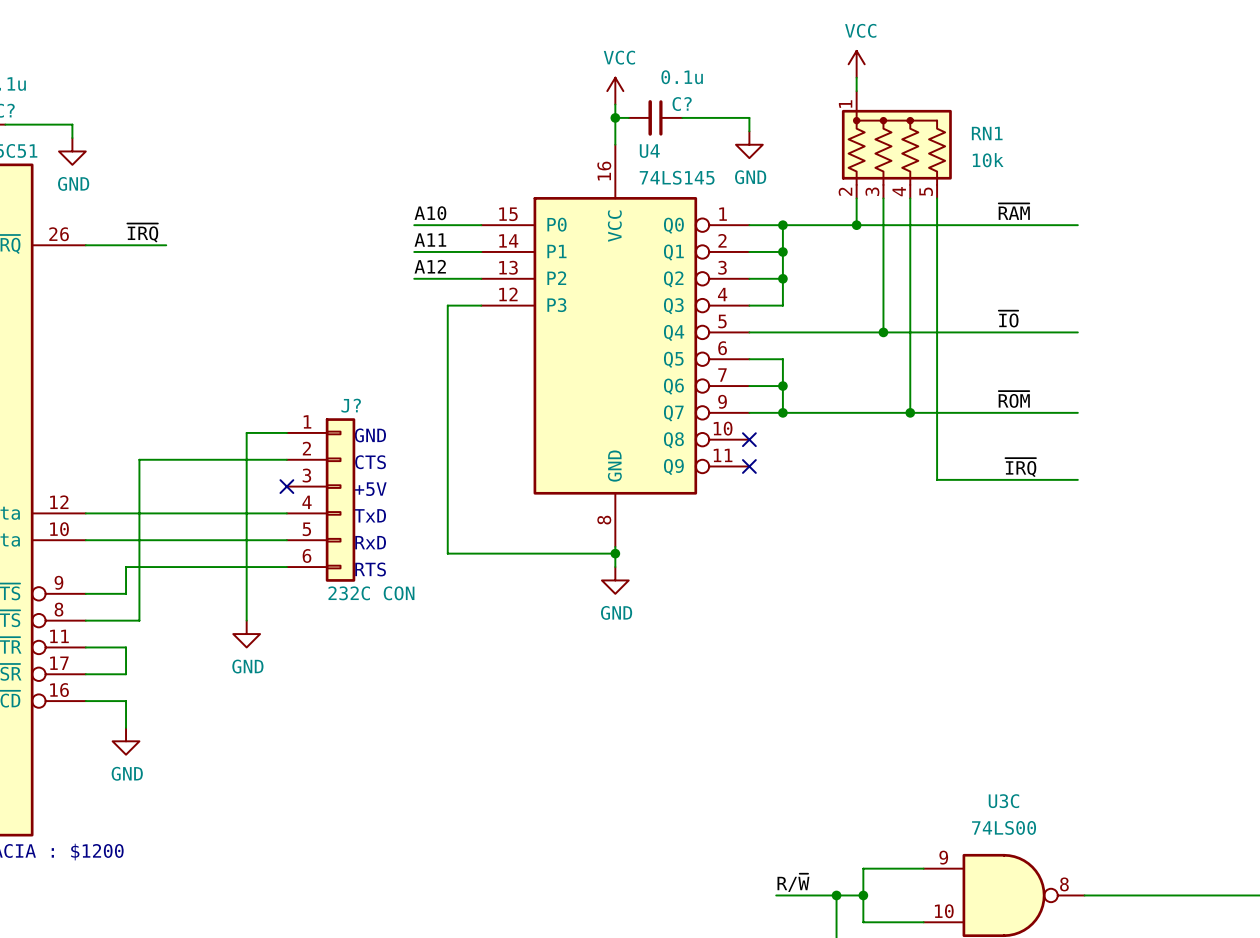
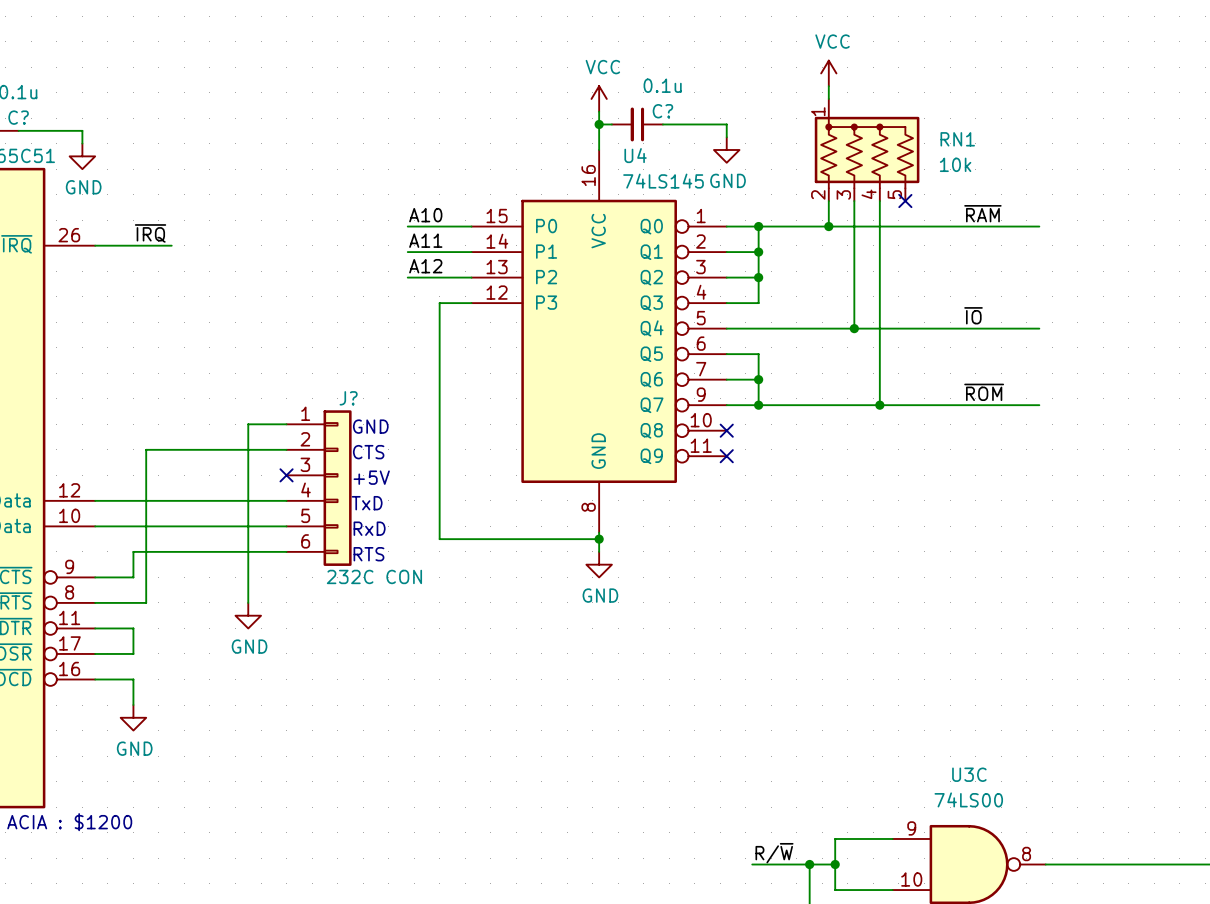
wire: (937, 198) (937, 479) (1077, 479) -> none
no-connect mark: none -> (905, 201)
label: ~{IRQ} (1020, 467) -> none

